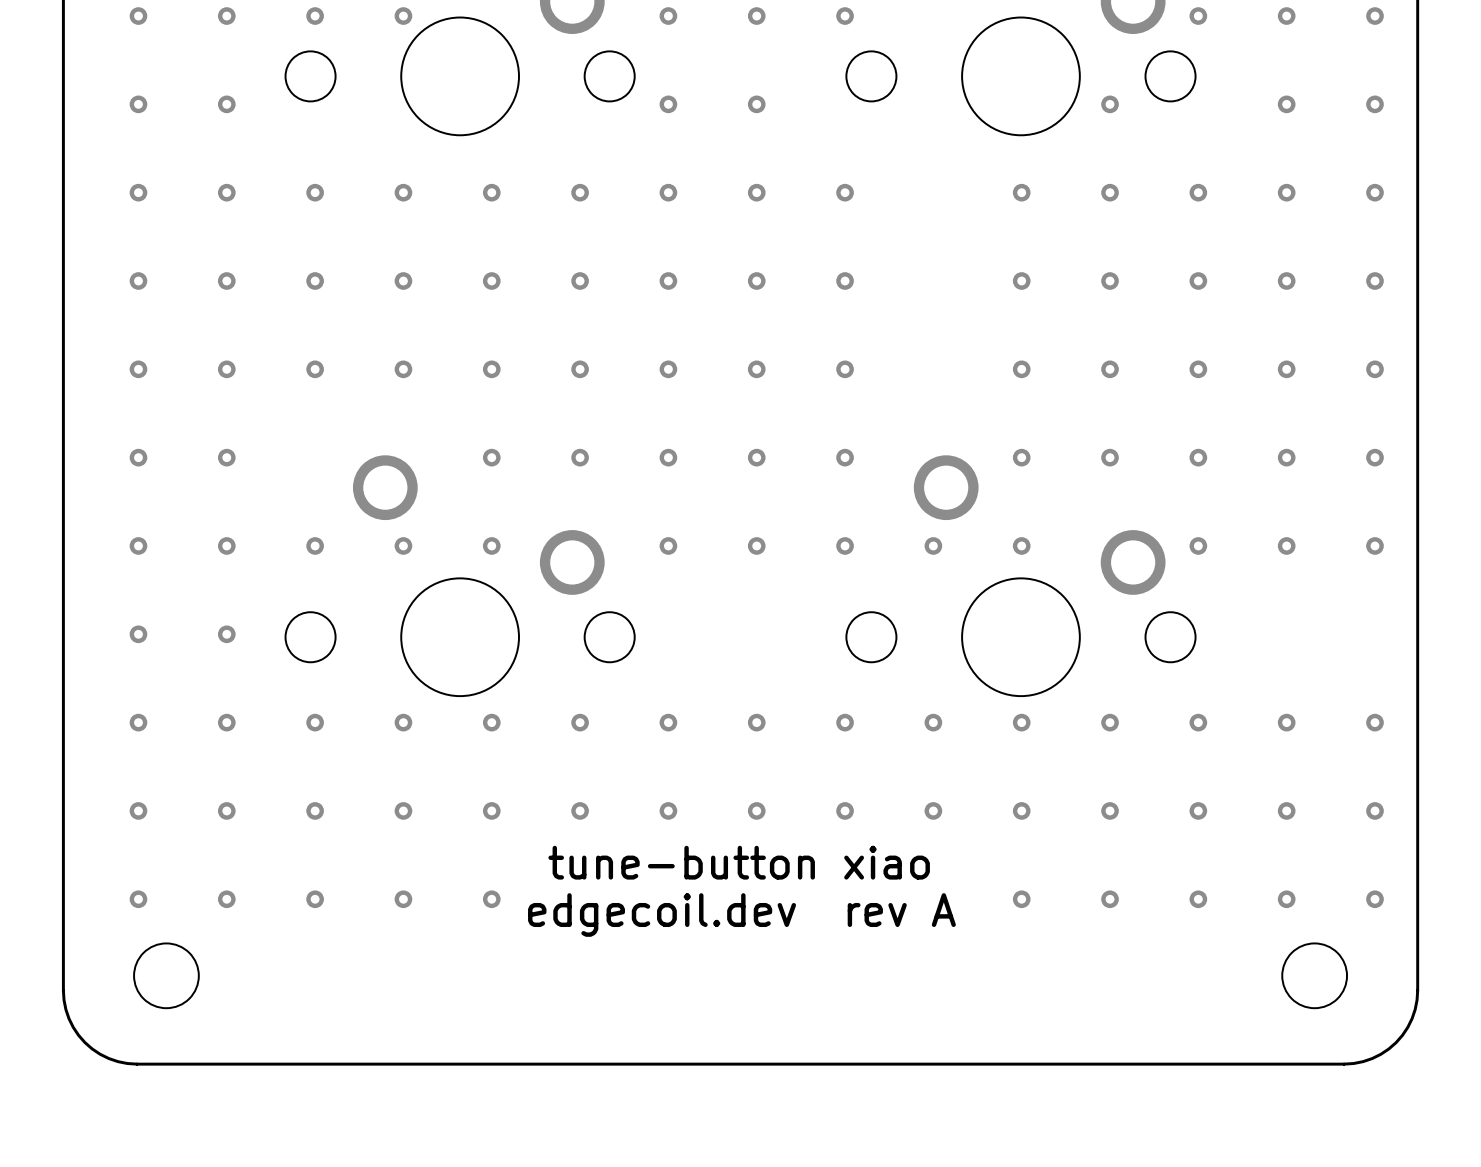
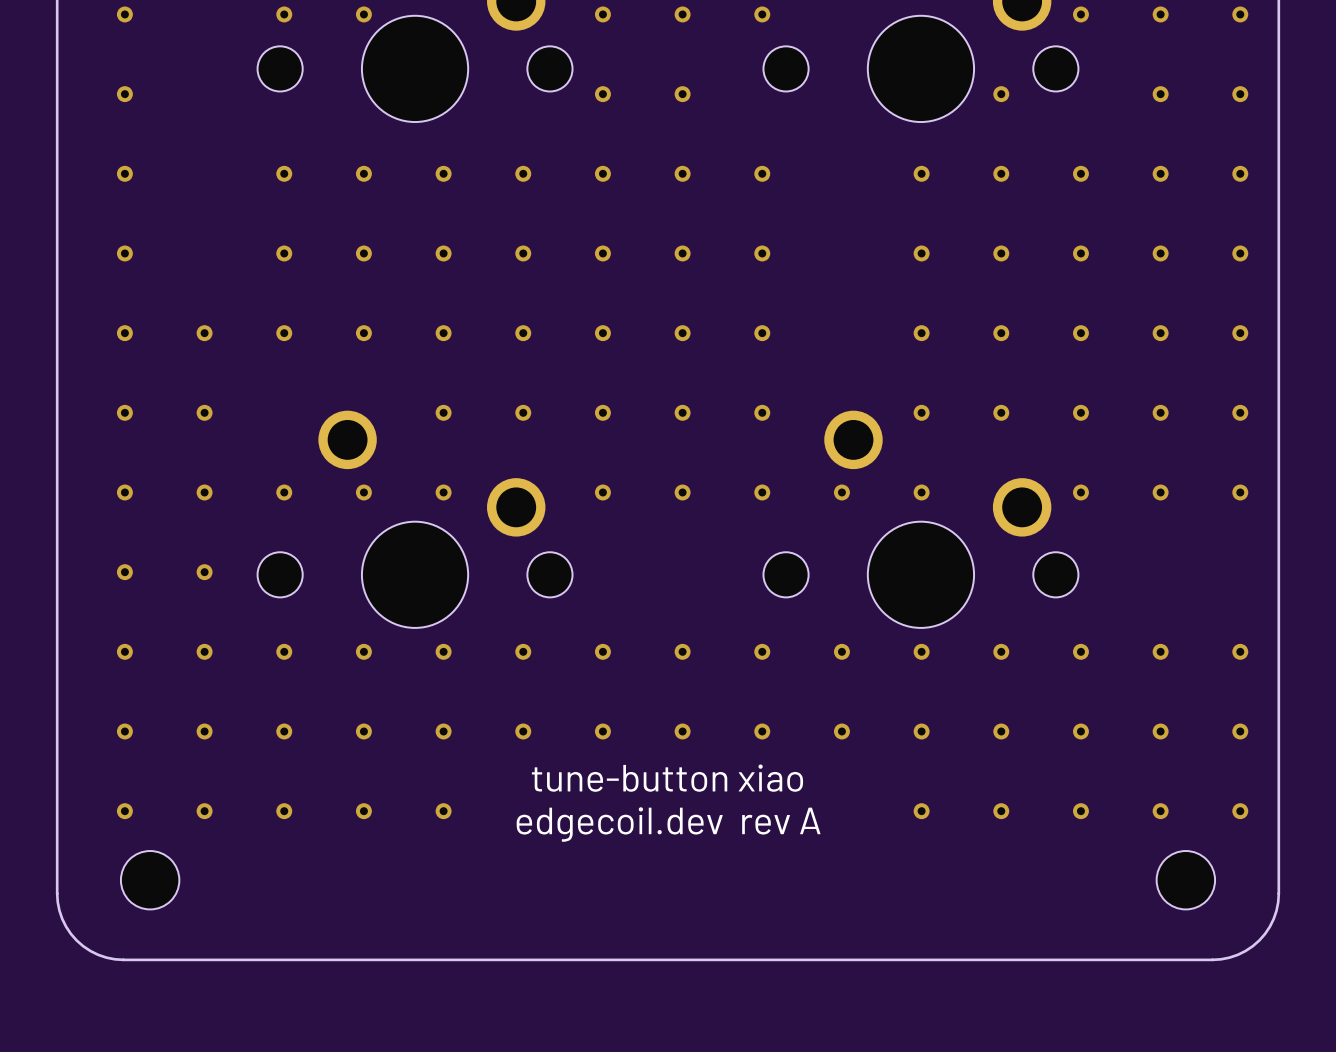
via: (226, 16) -> none
via: (226, 104) -> none
via: (226, 192) -> none
via: (226, 281) -> none

